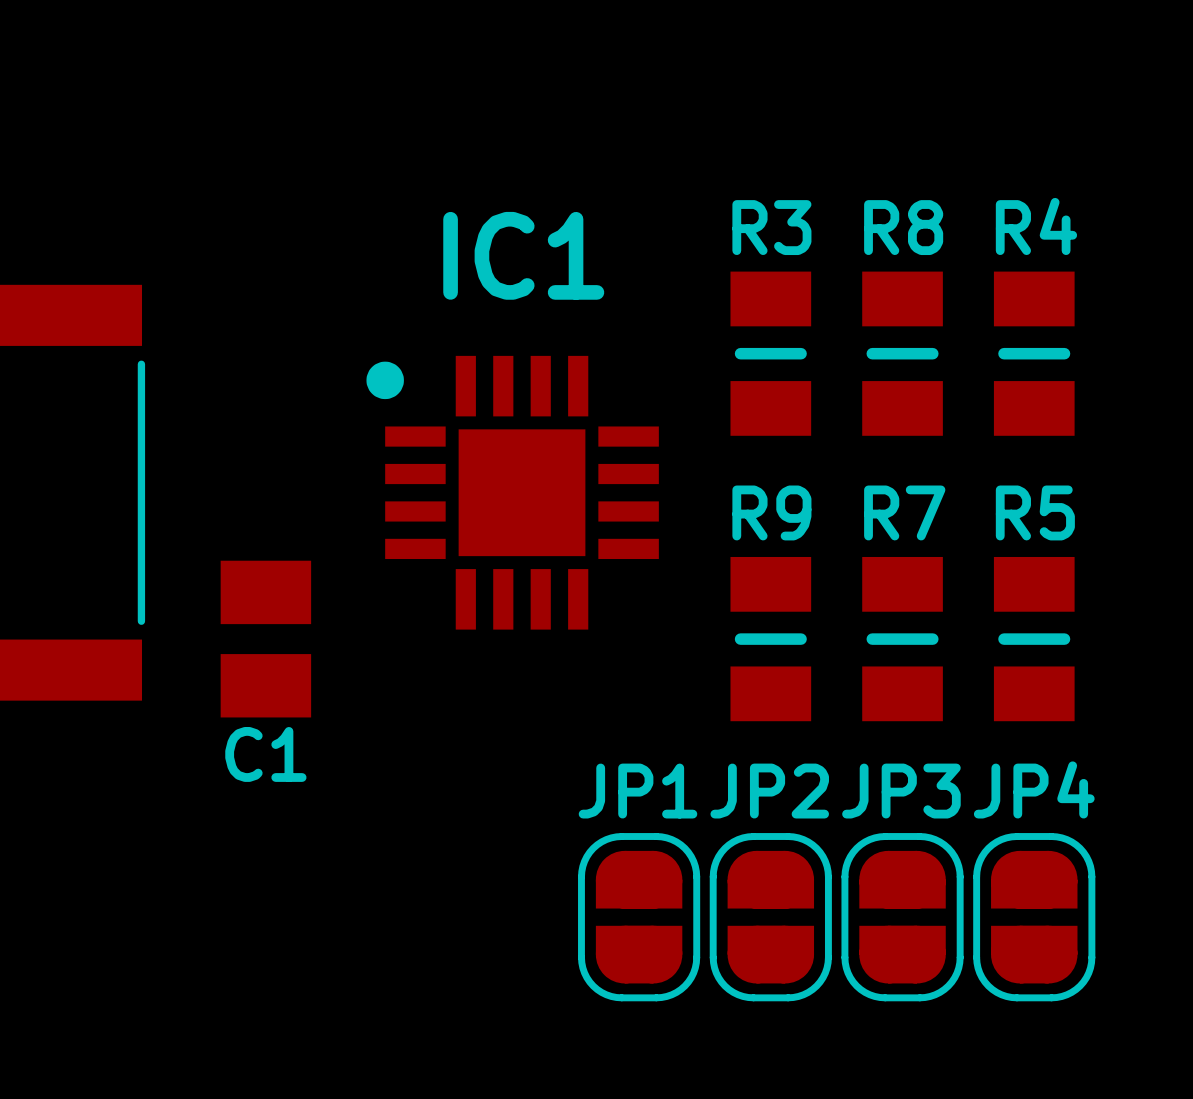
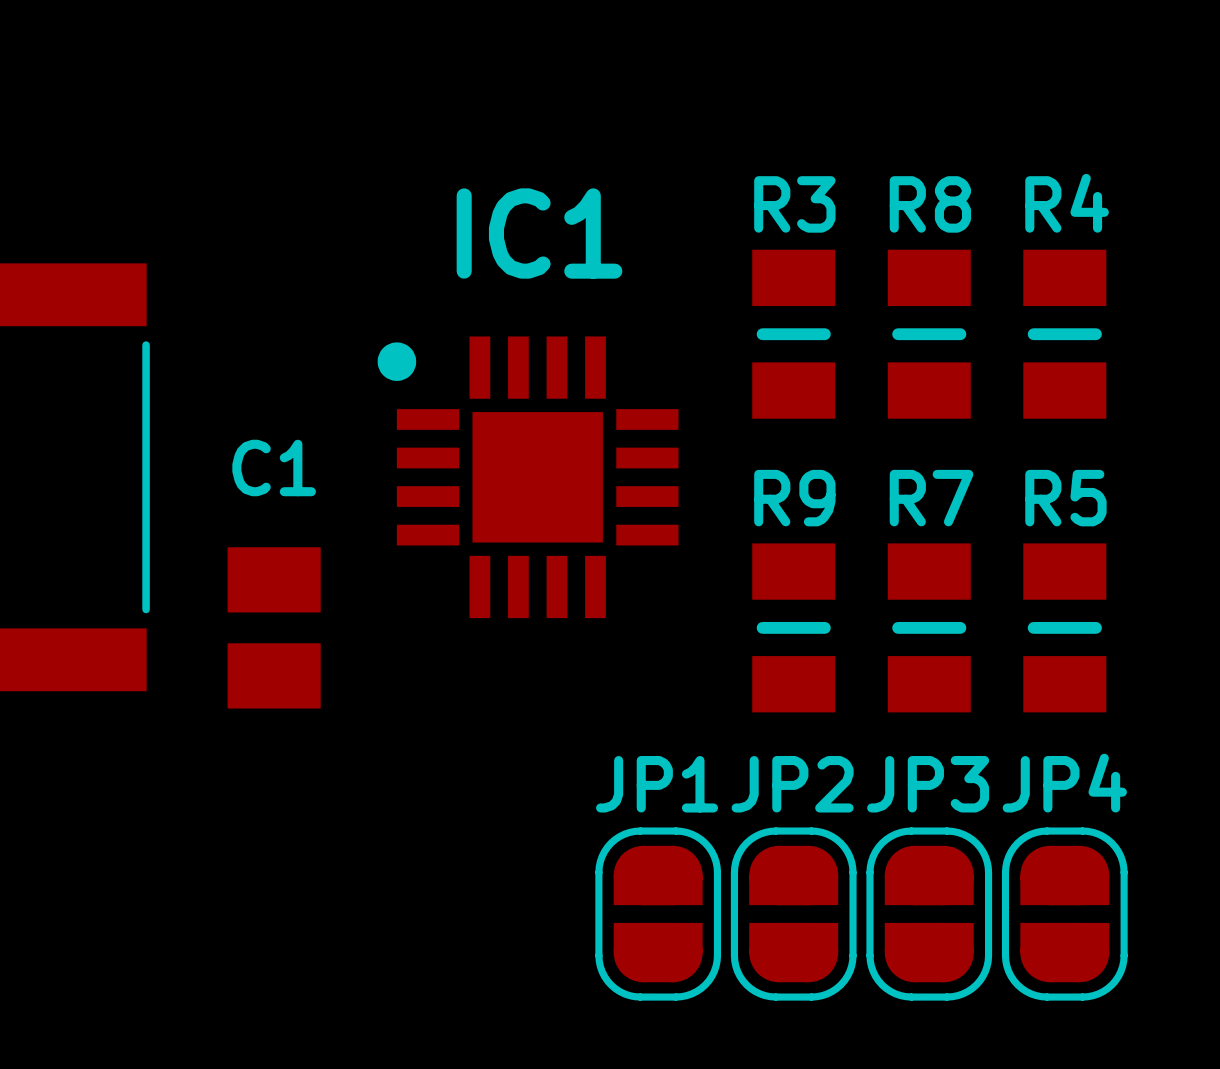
C1 name position: C1 (265, 754) -> C1 (274, 467)

